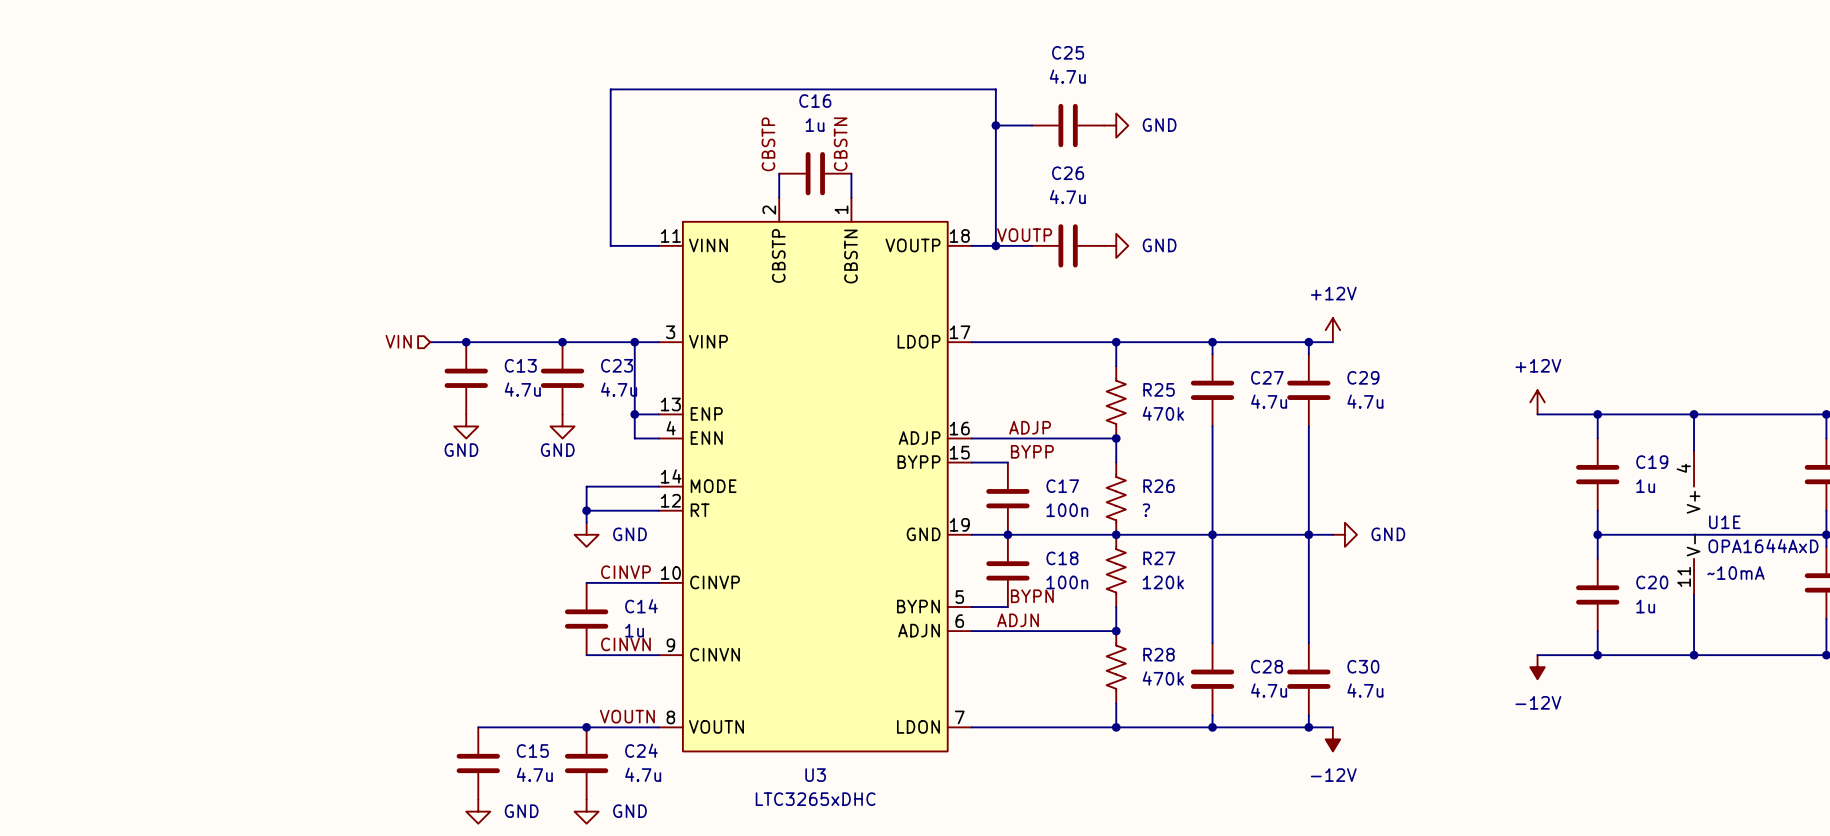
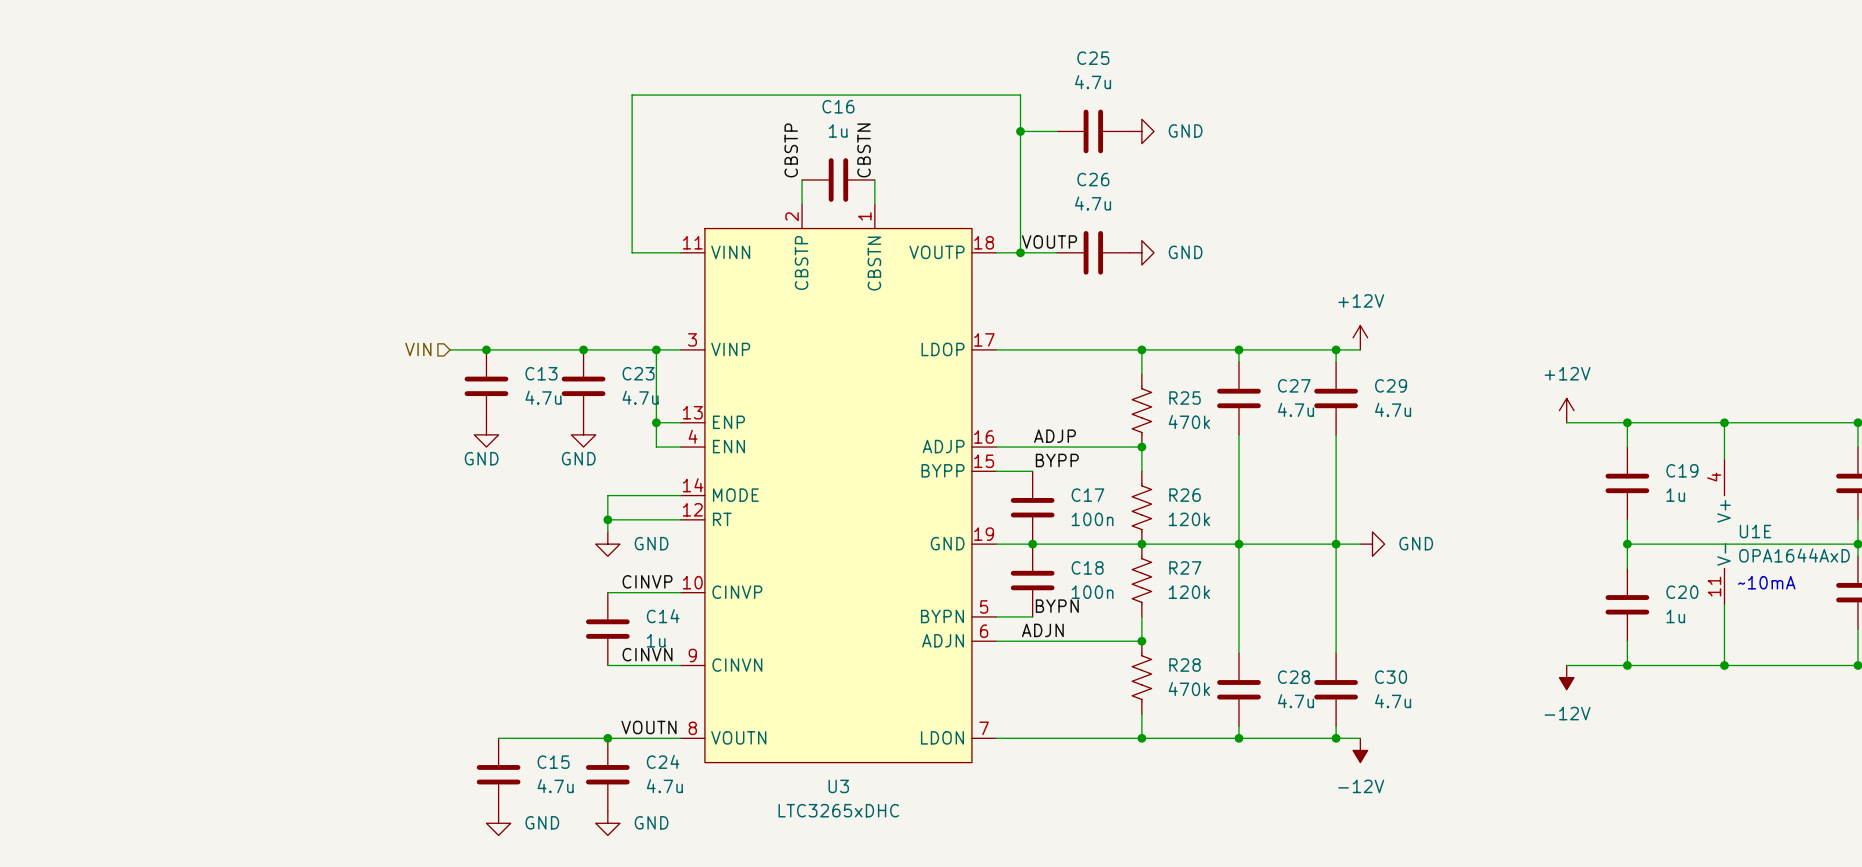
R26 value: ? (1146, 510) -> 120k (1189, 519)

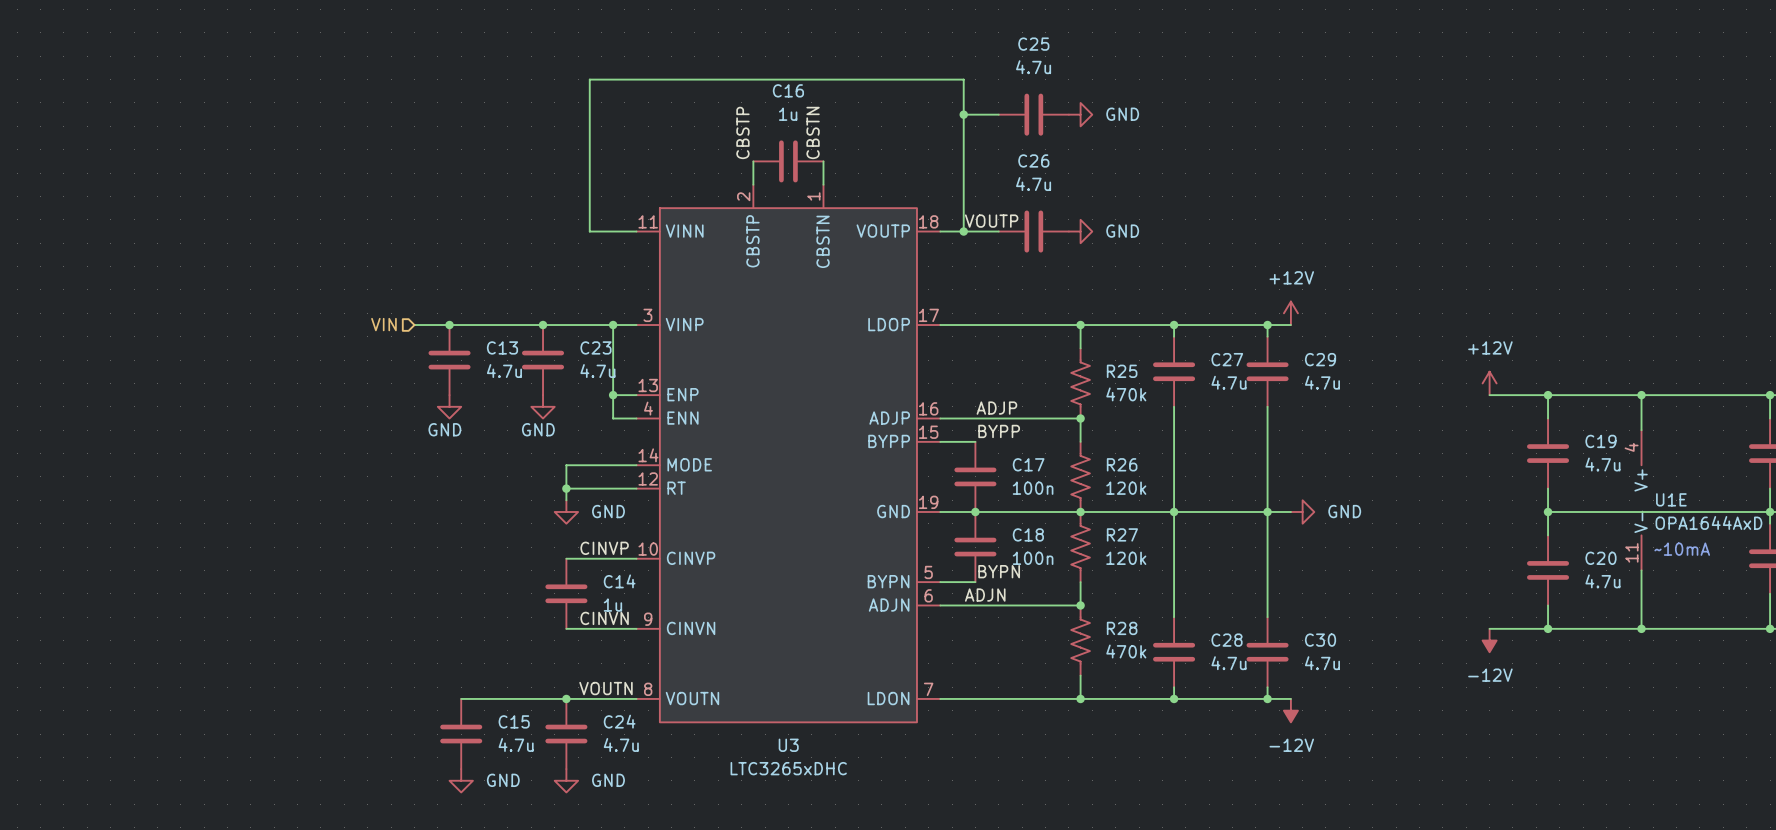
C19 value: 1u (1675, 495) -> 4.7u (1602, 464)
C20 value: 1u (1675, 616) -> 4.7u (1602, 581)

